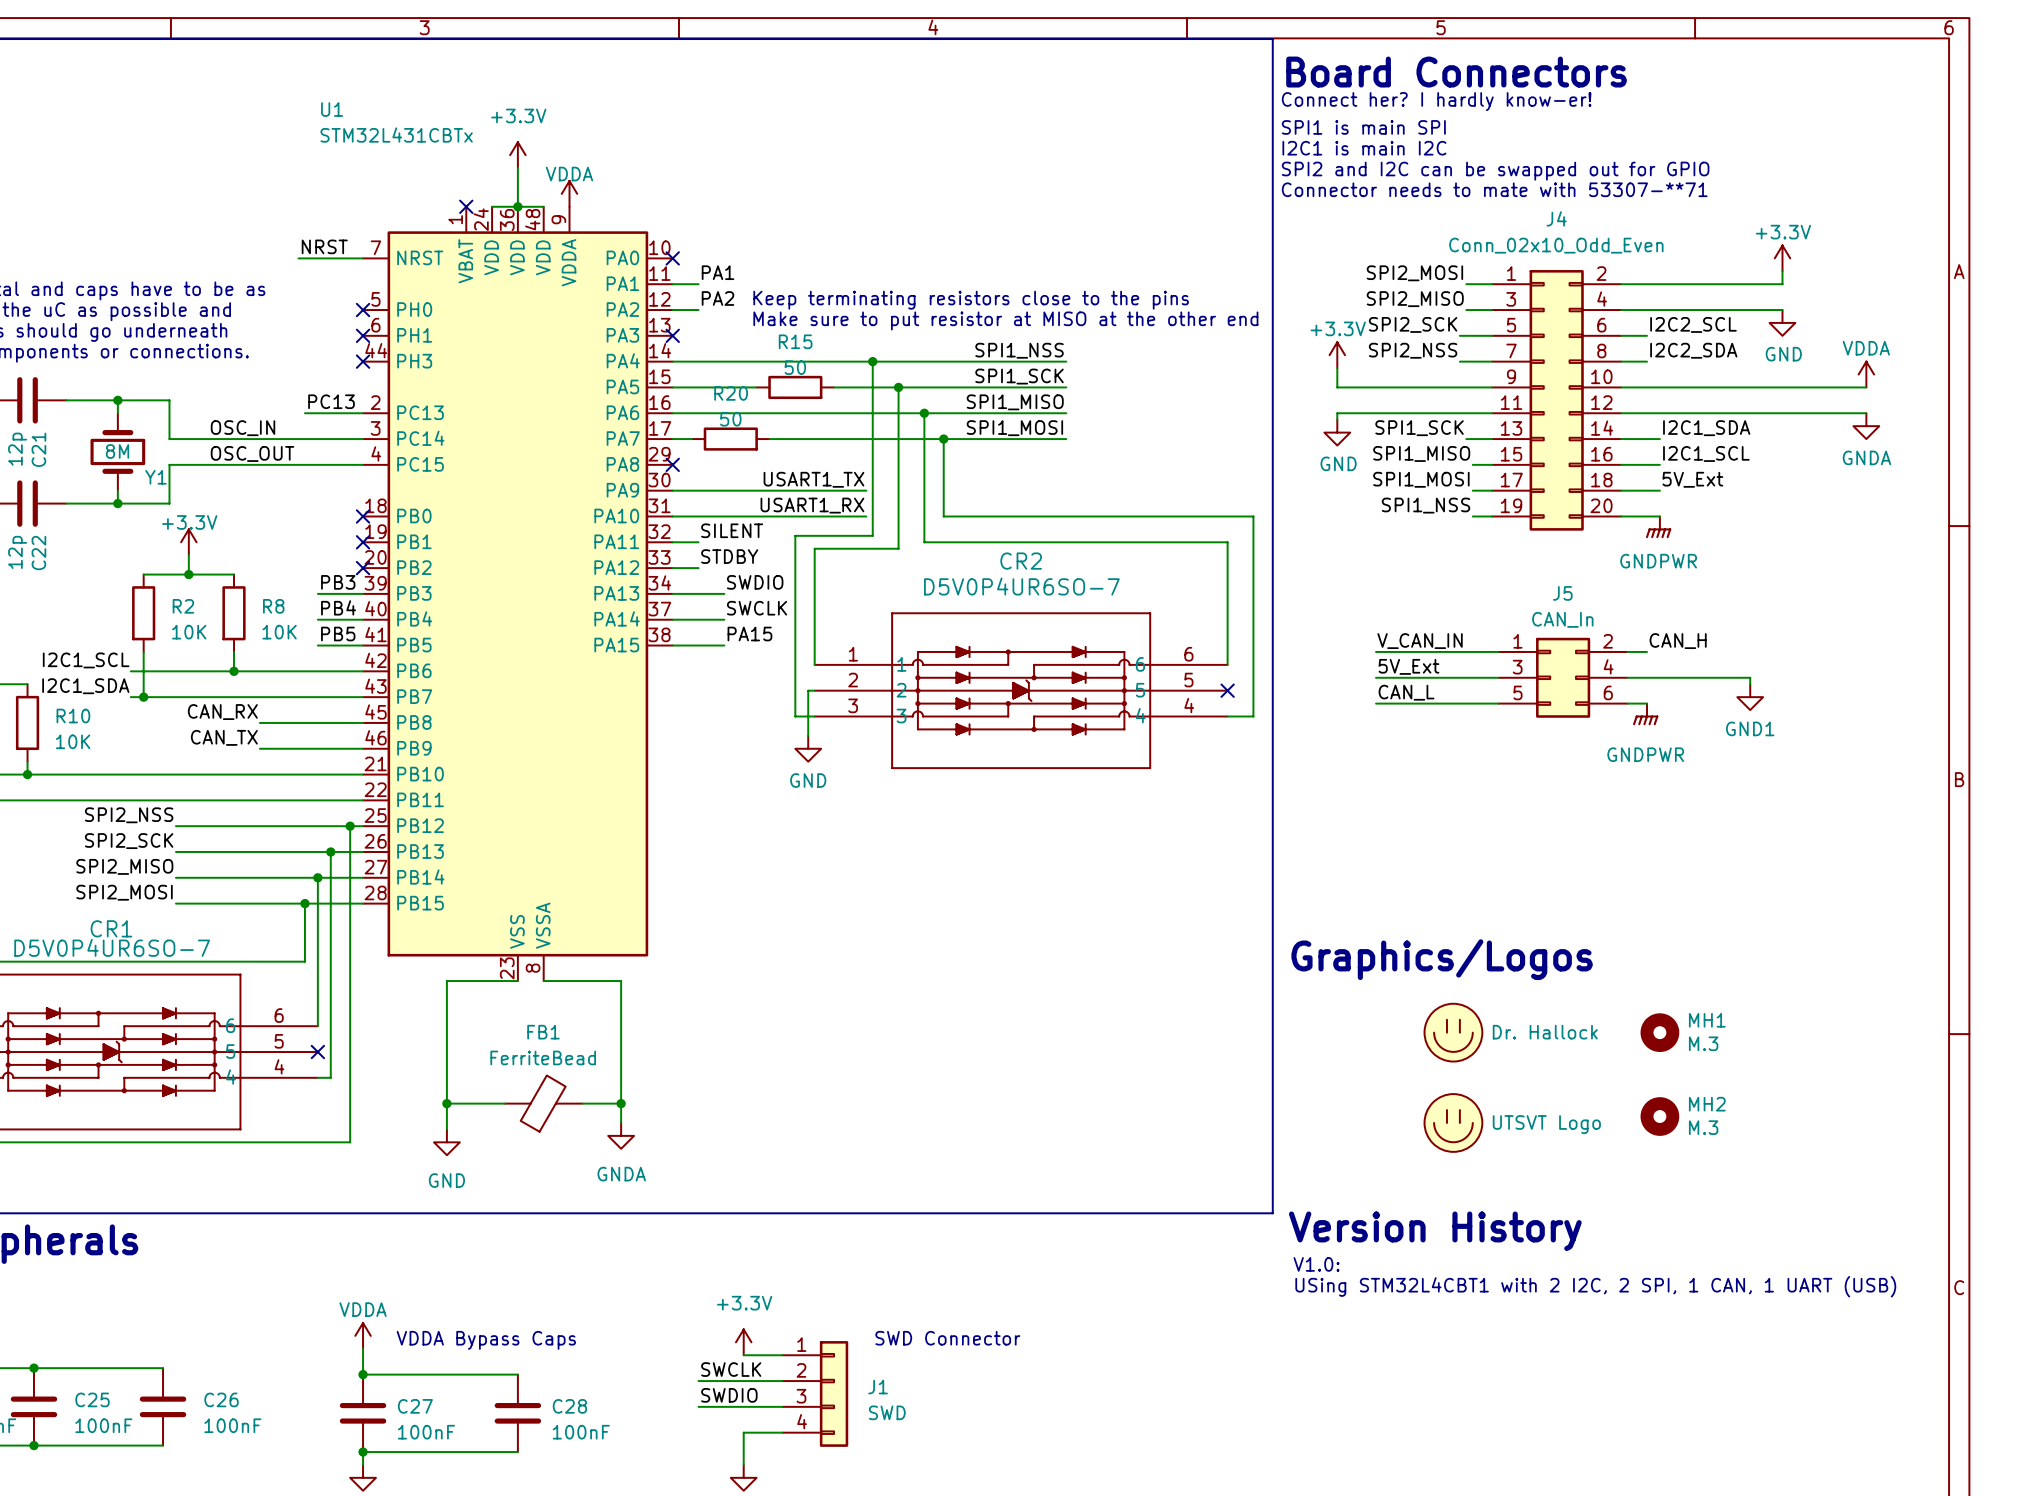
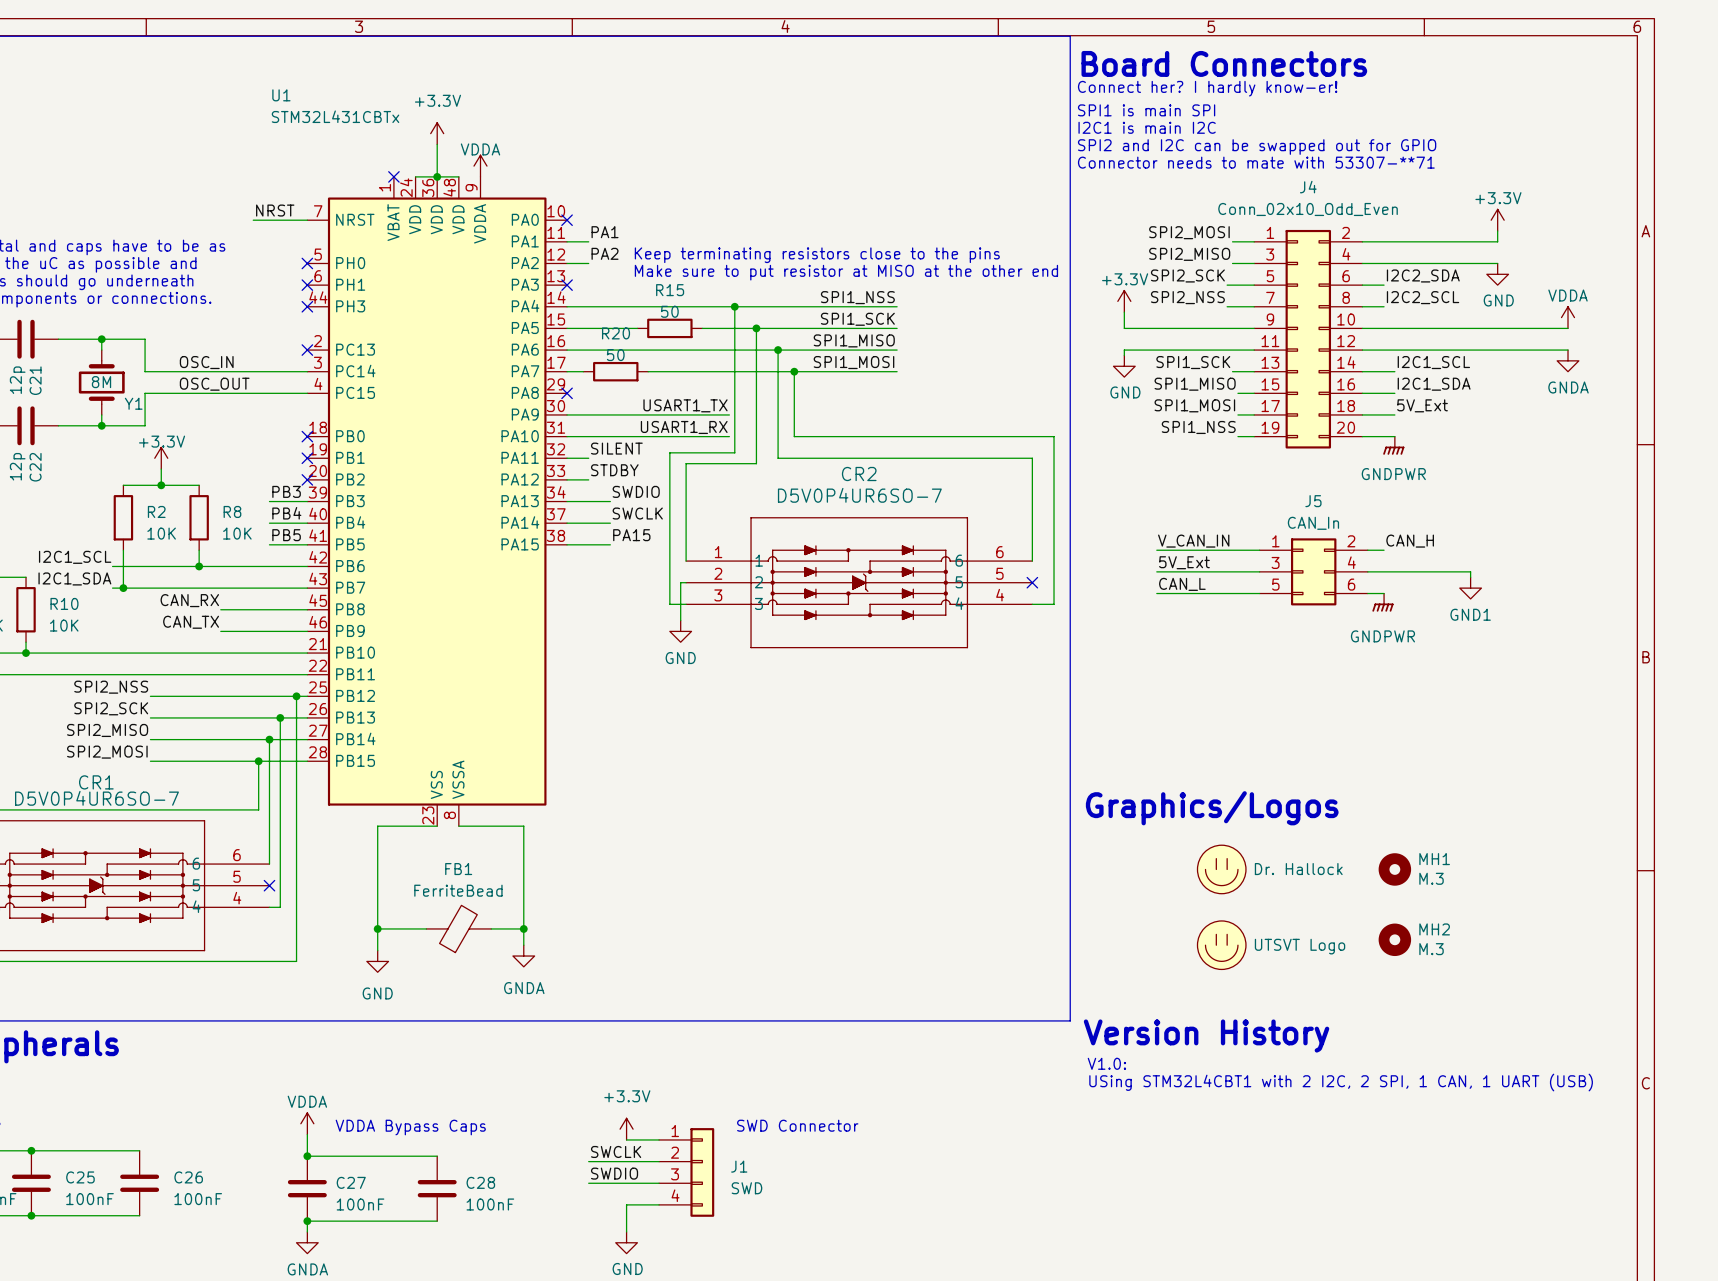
label: I2C2_SCL (1693, 324) -> I2C2_SDA (1423, 275)
label: I2C2_SDA (1693, 350) -> I2C2_SCL (1423, 297)
label: PC13 (331, 401) -> none
wire: (304, 413) (363, 413) -> none
no-connect mark: none -> (307, 350)
label: I2C1_SDA (1706, 428) -> I2C1_SCL (1433, 362)
label: I2C1_SCL (1706, 453) -> I2C1_SDA (1434, 384)

